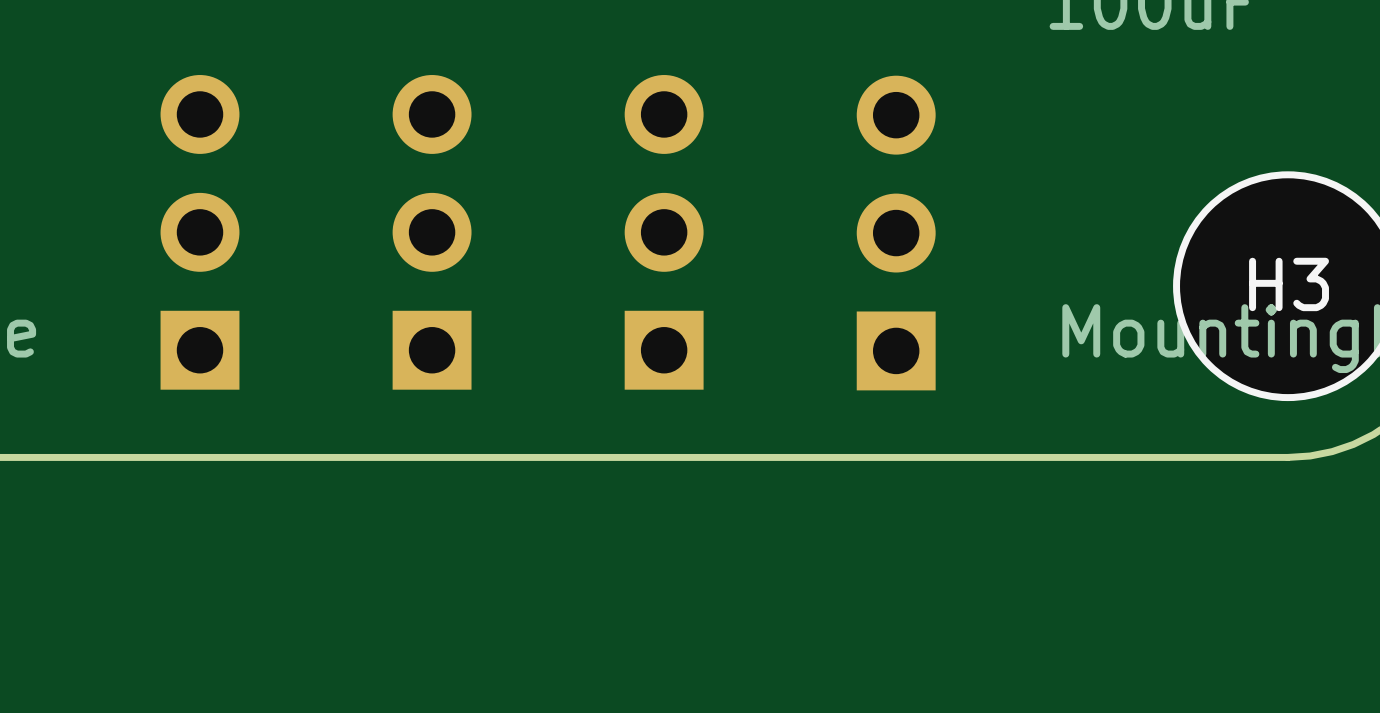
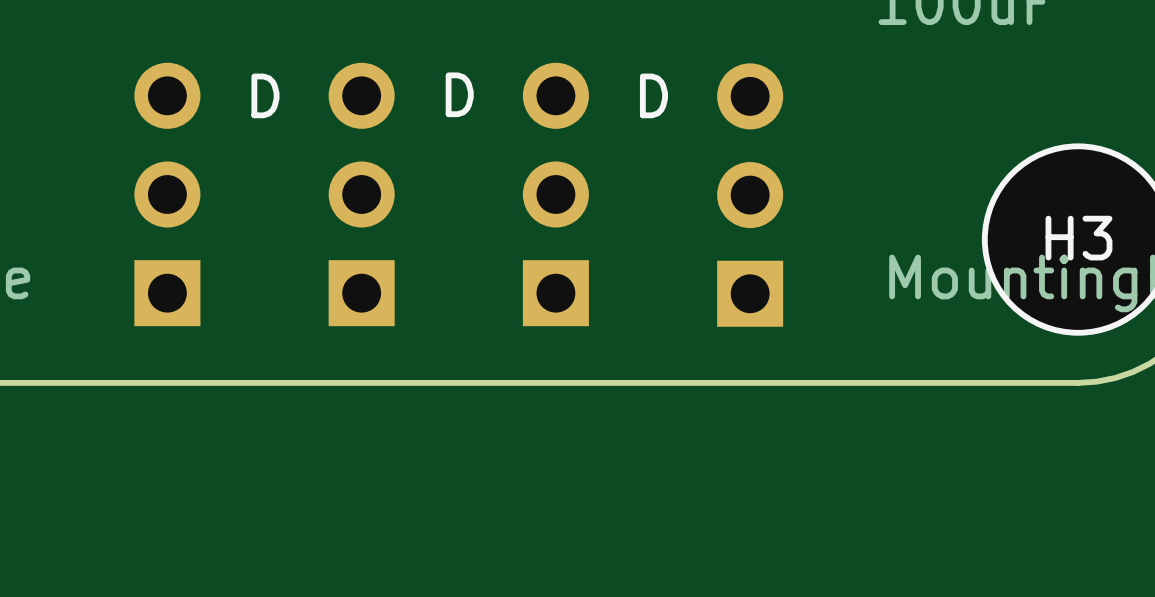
text: none -> D (459, 94)
text: none -> D (265, 95)
text: none -> D (653, 95)

